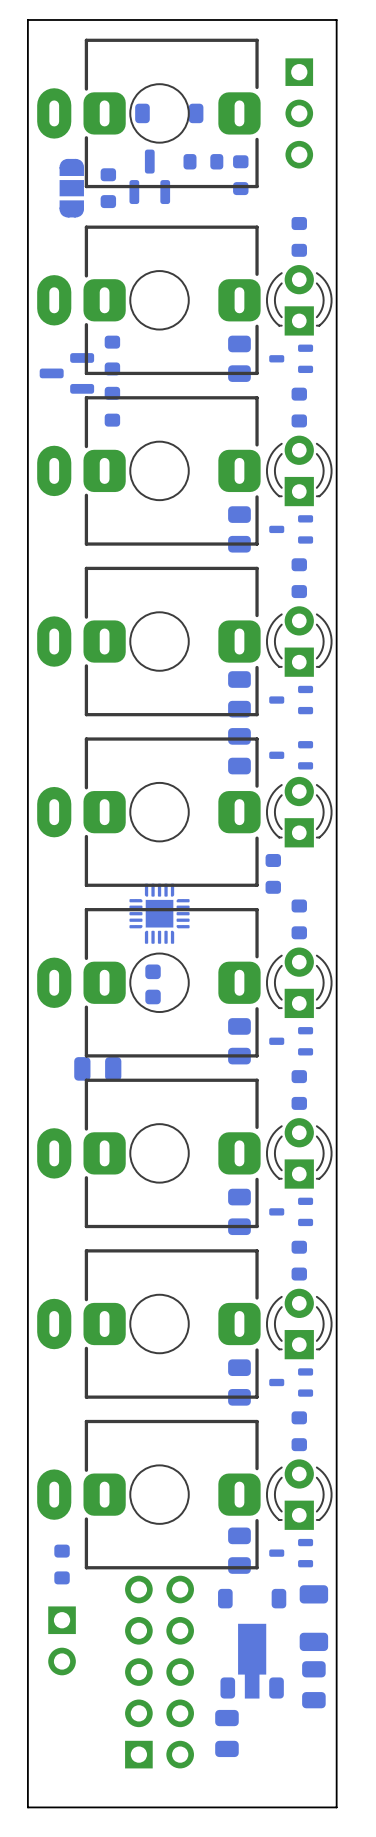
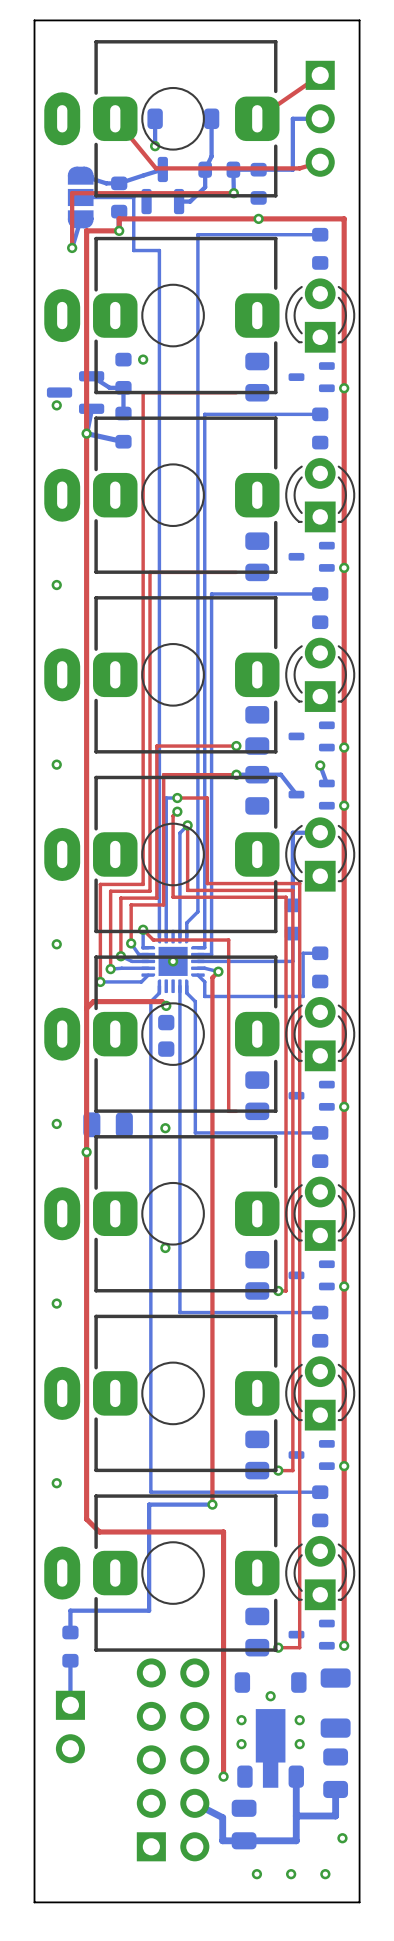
top track: none -> (320, 75) (257, 118)
top track: none -> (115, 118) (155, 168) (299, 168) (320, 162)
bottom track: none -> (155, 118) (155, 146)
bottom track: none -> (211, 118) (211, 156) (205, 169) (205, 187) (190, 201) (179, 201)
bottom track: none -> (320, 118) (292, 118) (292, 169) (233, 169) (233, 193)
via: none -> (155, 146)
bottom track: none -> (162, 169) (119, 183) (106, 183) (80, 175)
top track: none -> (233, 193) (72, 193) (72, 247)
via: none -> (233, 193)
bottom track: none -> (80, 197) (133, 197) (133, 250) (159, 250) (159, 936)
via: none -> (258, 218)
bottom track: none -> (80, 219) (72, 247)
via: none -> (119, 230)
bottom track: none -> (320, 234) (197, 234) (197, 911) (186, 922) (186, 936)
via: none -> (72, 247)
via: none -> (143, 359)
bottom track: none -> (91, 376) (109, 387) (123, 387) (123, 413)
via: none -> (344, 388)
top track: none -> (236, 392) (143, 392) (143, 884) (100, 884) (100, 981)
via: none -> (56, 405)
bottom track: none -> (91, 408) (86, 433) (123, 441)
bottom track: none -> (320, 414) (204, 414) (204, 947) (197, 947)
via: none -> (86, 433)
via: none -> (344, 567)
top track: none -> (236, 572) (149, 572) (149, 891) (110, 891) (110, 969)
via: none -> (56, 585)
bottom track: none -> (320, 593) (211, 593) (211, 954) (197, 954)
top track: none -> (236, 746) (156, 746) (156, 898) (120, 898) (120, 956)
via: none -> (236, 746)
via: none -> (344, 747)
via: none -> (56, 764)
bottom track: none -> (320, 765) (326, 783)
via: none -> (320, 765)
bottom track: none -> (236, 774) (280, 774) (296, 794)
top track: none -> (236, 774) (163, 774) (163, 904) (131, 904) (131, 943)
via: none -> (236, 774)
bottom track: none -> (177, 798) (166, 798) (166, 936)
top track: none -> (177, 798) (207, 798) (207, 883) (299, 883) (299, 1647) (278, 1647)
via: none -> (177, 798)
via: none -> (344, 805)
top track: none -> (177, 811) (173, 815) (173, 897) (286, 897) (286, 1290) (278, 1290)
via: none -> (177, 811)
bottom track: none -> (187, 825) (179, 833) (179, 936)
top track: none -> (187, 825) (187, 890) (292, 890) (292, 1470) (278, 1470)
via: none -> (187, 825)
bottom track: none -> (320, 832) (292, 832) (292, 905)
bottom track: none -> (143, 929) (143, 947) (148, 947)
top track: none -> (143, 929) (153, 940) (228, 940) (228, 1111) (236, 1111)
via: none -> (143, 929)
bottom track: none -> (292, 933) (292, 961) (197, 961)
bottom track: none -> (131, 943) (138, 954) (148, 954)
via: none -> (131, 943)
via: none -> (56, 944)
bottom track: none -> (320, 953) (303, 953) (303, 996) (204, 996) (204, 981) (197, 975)
bottom track: none -> (120, 956) (132, 961) (148, 961)
via: none -> (120, 956)
via: none -> (173, 961)
bottom track: none -> (148, 968) (110, 969)
bottom track: none -> (197, 968) (218, 971)
via: none -> (110, 969)
top track: none -> (218, 971) (212, 977) (212, 1504)
via: none -> (218, 971)
bottom track: none -> (148, 975) (141, 981) (100, 981)
via: none -> (100, 981)
bottom track: none -> (159, 986) (159, 993) (150, 1001) (150, 1492) (320, 1492)
bottom track: none -> (179, 986) (179, 1312) (320, 1312)
bottom track: none -> (186, 986) (186, 993) (195, 1001) (195, 1132) (320, 1132)
top track: none -> (166, 1005) (161, 1001) (93, 1001) (86, 1008)
via: none -> (166, 1005)
top track: none -> (86, 1008) (86, 230) (119, 230) (119, 218) (344, 218) (344, 1645)
top track: none -> (86, 1008) (86, 1519) (99, 1531) (223, 1531) (223, 1776)
via: none -> (344, 1106)
via: none -> (56, 1123)
via: none -> (165, 1128)
via: none -> (86, 1152)
via: none -> (165, 1247)
via: none -> (344, 1286)
via: none -> (278, 1290)
via: none -> (56, 1303)
via: none -> (344, 1466)
via: none -> (278, 1470)
via: none -> (56, 1483)
bottom track: none -> (212, 1504) (149, 1504) (149, 1610) (70, 1610) (70, 1632)
via: none -> (212, 1504)
via: none -> (344, 1645)
via: none -> (278, 1647)
bottom track: none -> (70, 1660) (70, 1705)
via: none -> (270, 1696)
via: none -> (241, 1720)
via: none -> (299, 1720)
via: none -> (241, 1744)
via: none -> (299, 1744)
via: none -> (223, 1776)
bottom track: none -> (296, 1776) (296, 1840) (222, 1840) (222, 1817) (194, 1803)
bottom track: none -> (335, 1789) (335, 1815) (296, 1815)
via: none -> (342, 1838)
via: none -> (256, 1874)
via: none -> (291, 1874)
via: none -> (325, 1874)

